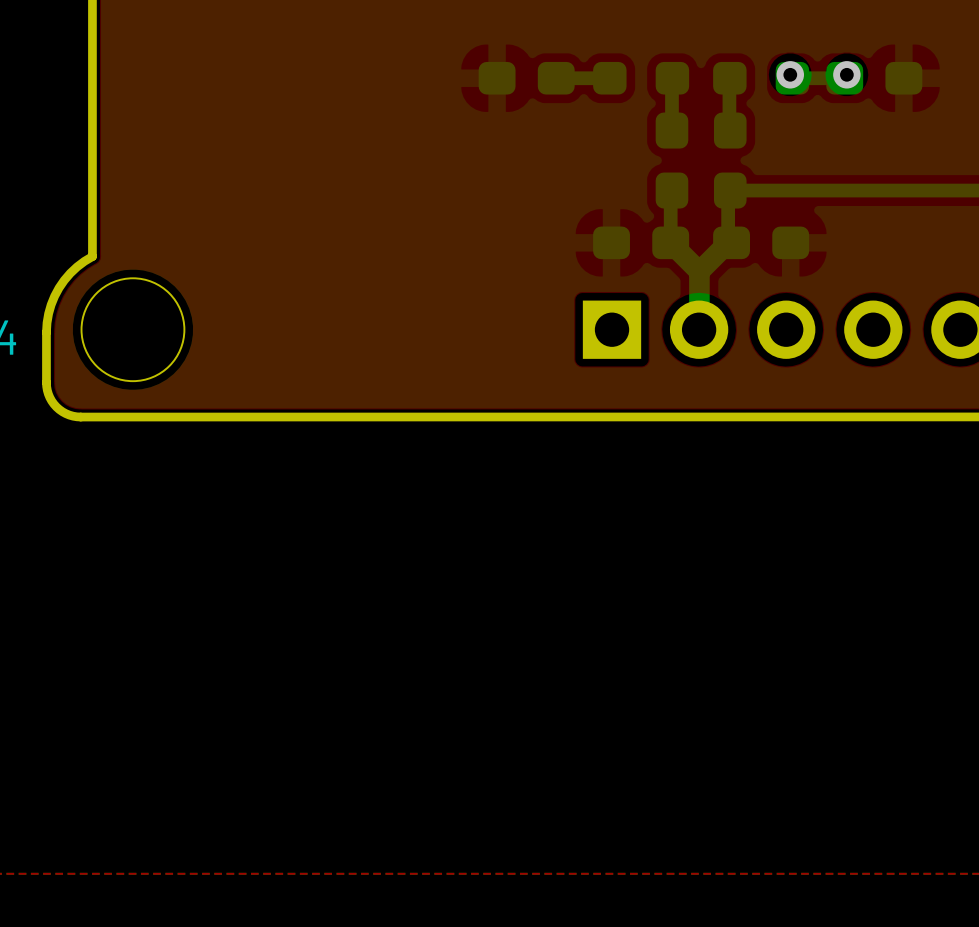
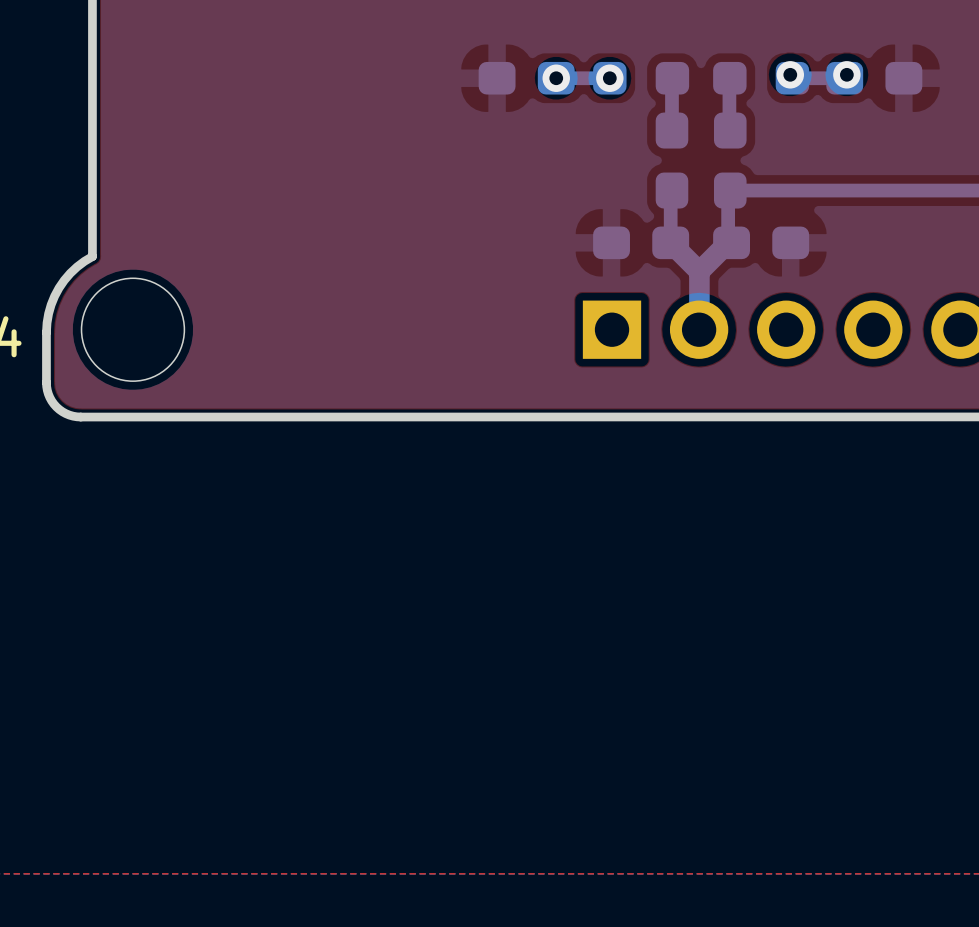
via: none -> (556, 78)
via: none -> (609, 78)

